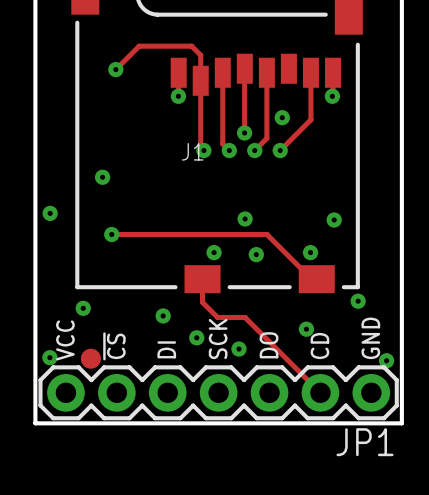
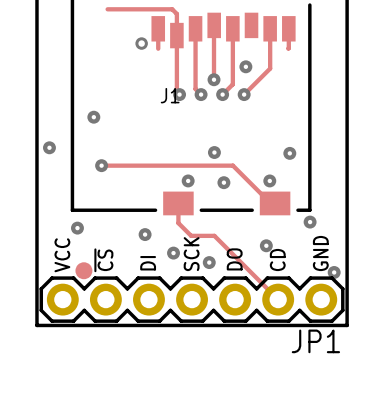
track: (195, 49) (191, 46) (139, 46) (115, 69) -> (172, 9) (107, 9)
via: (115, 69) -> none
via: none -> (141, 43)
via: (178, 96) -> none
via: (332, 96) -> none
via: (49, 357) -> none

